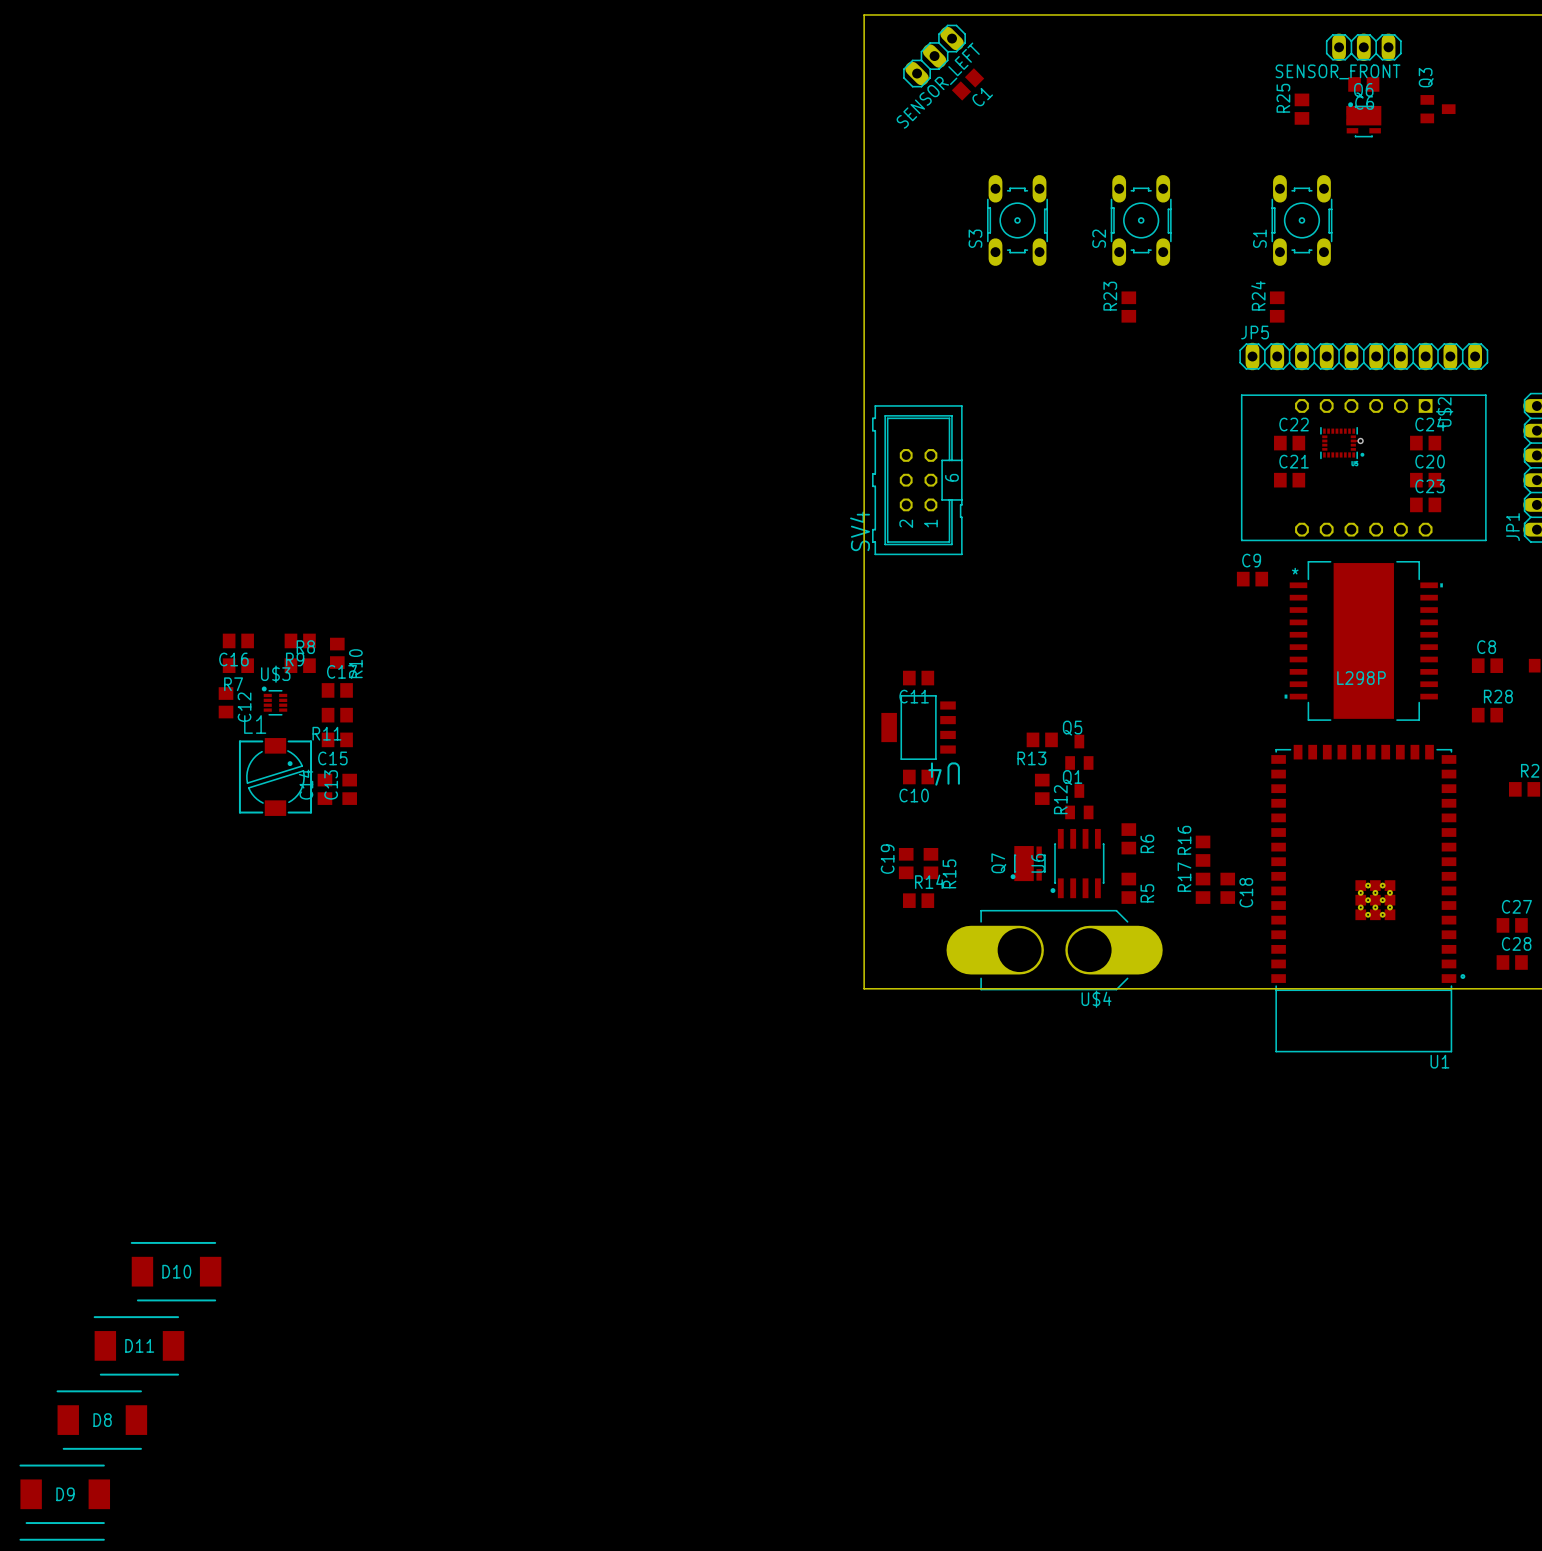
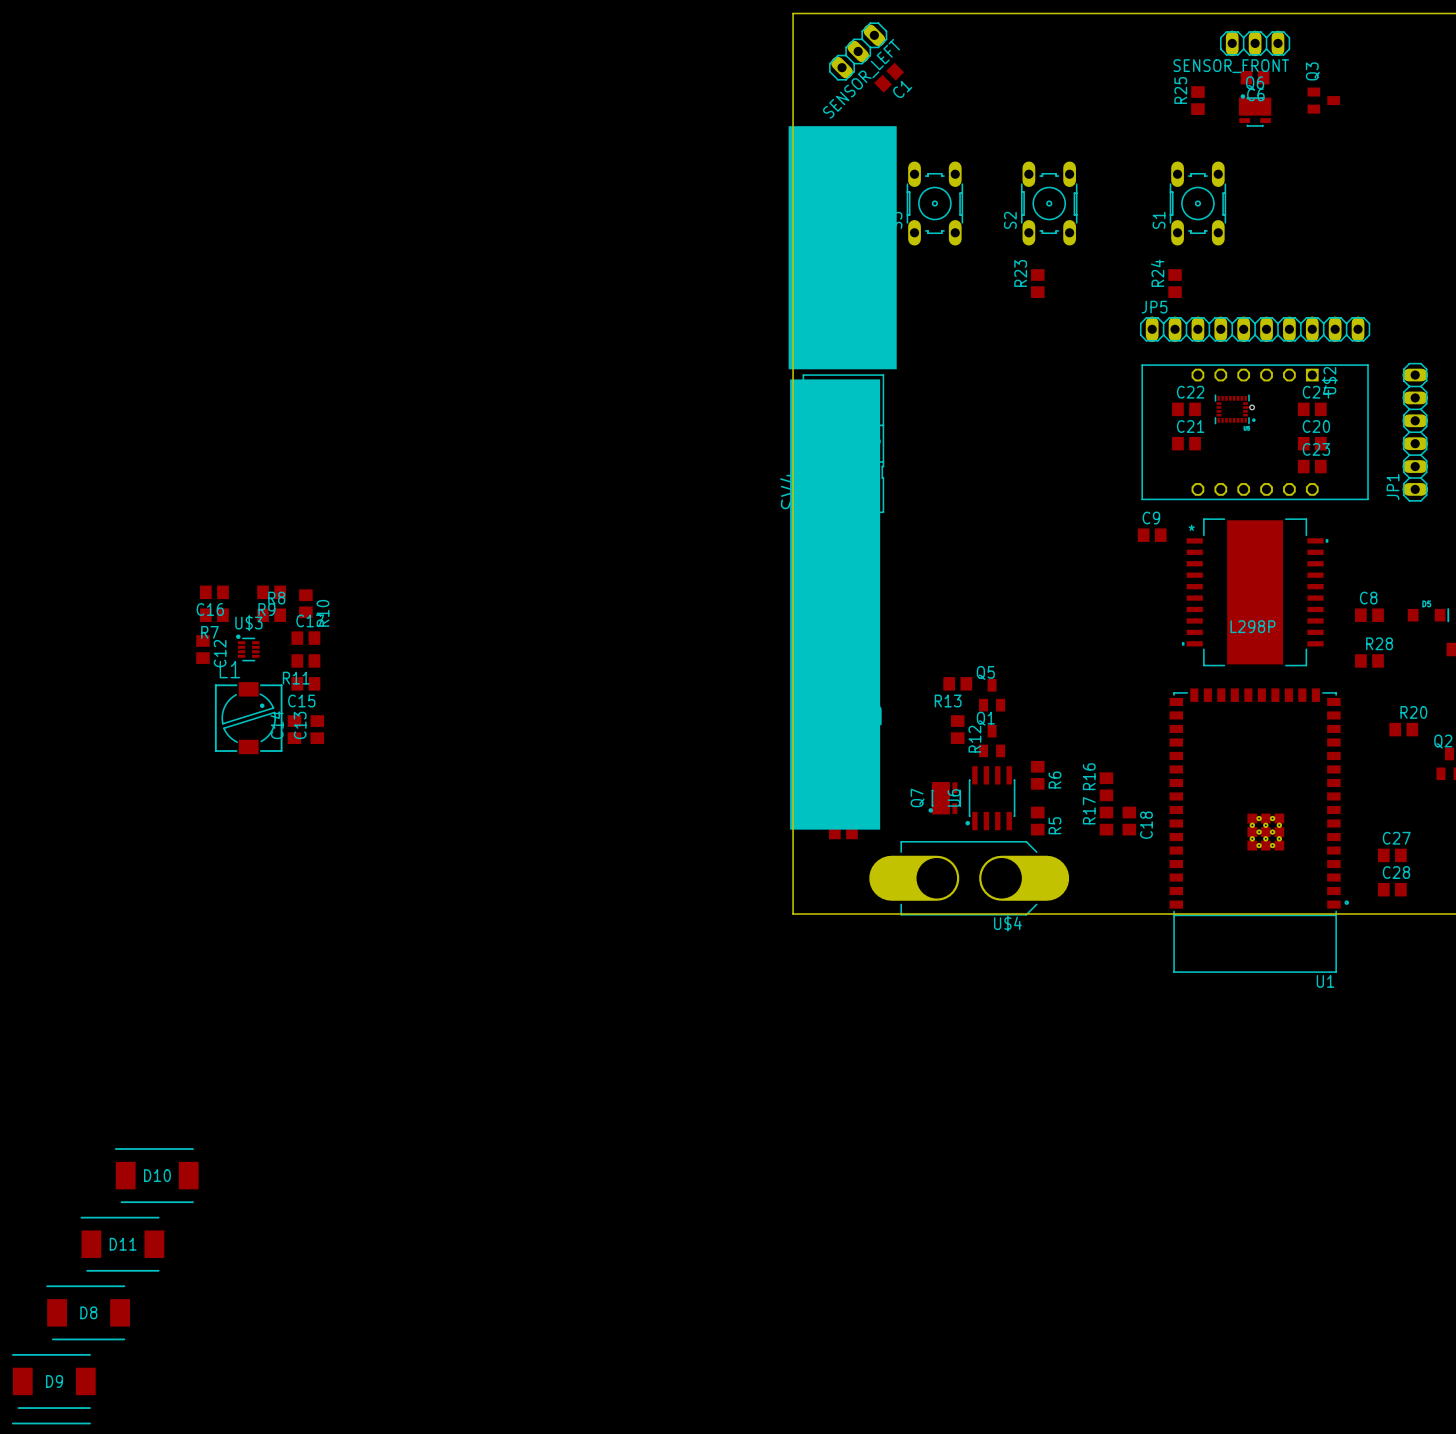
part: none -> (842, 247)
part: none -> (835, 604)

